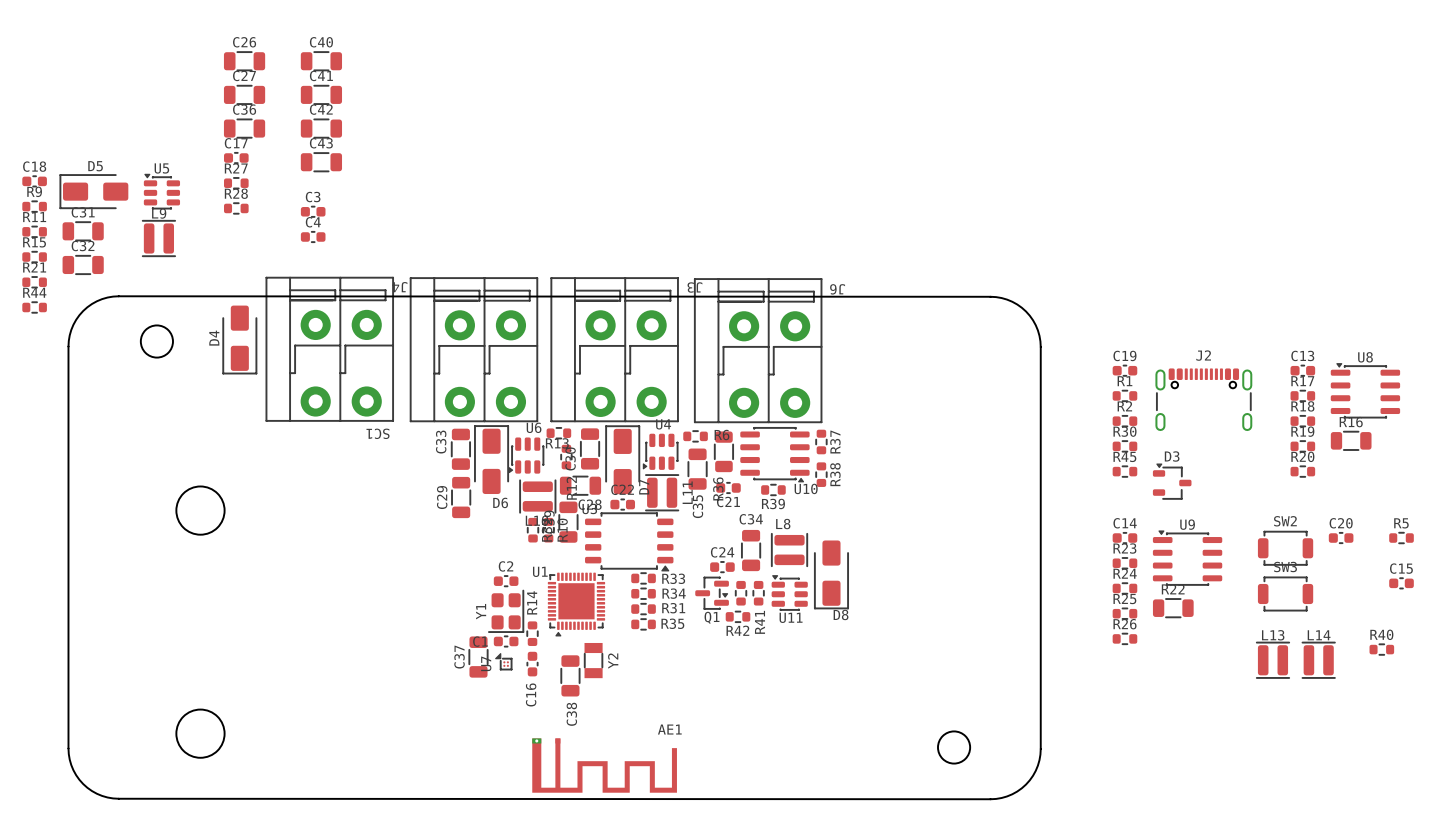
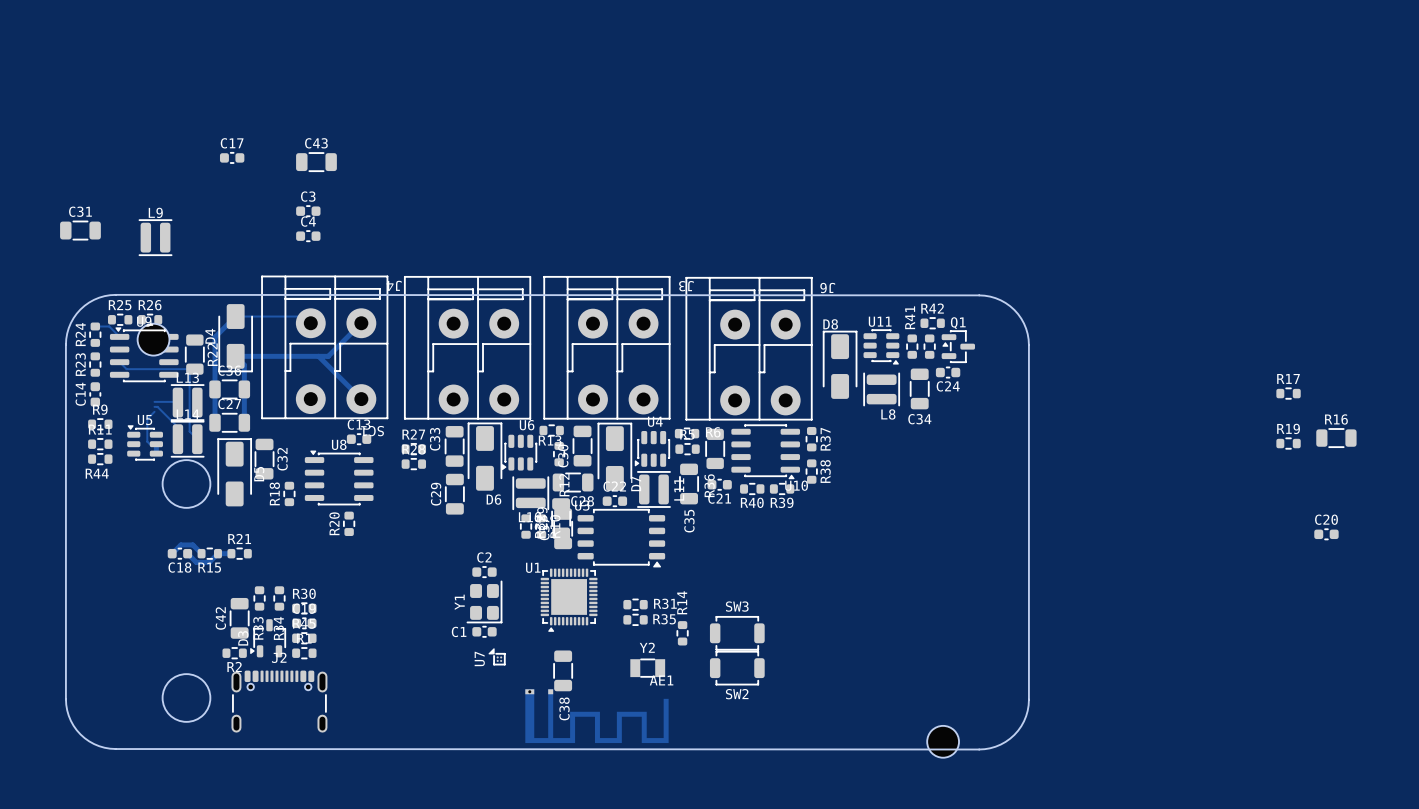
C26: (244, 61) -> none
C40: (321, 61) -> none
C27 position: (244, 94) -> (229, 422)
C41: (321, 94) -> none
C42 name position: C42 (321, 109) -> C42 (220, 618)
C36 position: (244, 128) -> (229, 389)
C42 rotation: 0° (321, 128) -> 90° clockwise (239, 618)
C42 position: (321, 128) -> (239, 618)
C18 name position: C18 (34, 166) -> C18 (179, 567)
C18 position: (34, 181) -> (179, 553)
R27 position: (236, 183) -> (413, 449)
D5 rotation: 0° (94, 191) -> 90° clockwise (234, 472)
D5 position: (94, 191) -> (234, 472)
U5 position: (161, 191) -> (145, 442)
R9 position: (34, 206) -> (100, 424)
R28 position: (236, 208) -> (413, 464)
R11 position: (34, 231) -> (100, 444)
R15 name position: R15 (34, 242) -> R15 (209, 567)
R15 position: (34, 257) -> (209, 553)
C32 rotation: 0° (83, 264) -> 90° clockwise (264, 459)
C32 position: (83, 264) -> (264, 459)
R21 position: (34, 282) -> (239, 553)
R44 name position: R44 (34, 292) -> R44 (97, 473)
R44 position: (34, 307) -> (100, 459)
track: none -> (310, 323) (304, 316) (235, 316) (215, 337) (215, 422)
track: none -> (361, 323) (328, 356) (235, 356) (244, 365) (244, 422)
track: none -> (95, 326) (109, 326) (119, 336)
part: none -> (929, 346)
track: none -> (318, 356) (361, 399)
track: none -> (119, 362) (126, 369) (194, 369)
C19 position: (1124, 370) -> (304, 623)
C13 position: (1302, 370) -> (359, 439)
track: none -> (194, 369) (189, 374) (189, 431) (197, 439)
U8 position: (1365, 390) -> (339, 477)
R1 position: (1124, 395) -> (304, 653)
J2 position: (1203, 399) -> (279, 701)
track: none -> (154, 401) (177, 402)
R2 name position: R2 (1124, 406) -> R2 (234, 666)
R18 name position: R18 (1302, 406) -> R18 (274, 493)
track: none -> (154, 406) (157, 406) (177, 427) (177, 439)
track: none -> (154, 411) (147, 419) (147, 441) (149, 444) (156, 444) (156, 453)
R2 position: (1124, 421) -> (234, 653)
R18 rotation: 0° (1302, 421) -> 90° clockwise (289, 493)
R18 position: (1302, 421) -> (289, 493)
R30 position: (1124, 446) -> (304, 608)
R20 name position: R20 (1302, 456) -> R20 (334, 523)
C35 position: (697, 469) -> (689, 484)
R45 position: (1124, 471) -> (304, 638)
R20 rotation: 0° (1302, 471) -> 90° clockwise (349, 523)
R20 position: (1302, 471) -> (349, 523)
D3 rotation: 0° (1172, 481) -> 90° counterclockwise (268, 638)
D3 position: (1172, 481) -> (268, 638)
R39 position: (773, 489) -> (782, 488)
part position: (200, 510) -> (186, 484)
C34 name position: C34 (751, 519) -> C34 (919, 419)
SW2 name position: SW2 (1285, 521) -> SW2 (737, 694)
C14 name position: C14 (1125, 523) -> C14 (80, 394)
L8 name position: L8 (783, 524) -> L8 (888, 414)
C14 rotation: 0° (1124, 538) -> 90° clockwise (95, 394)
C14 position: (1124, 538) -> (95, 394)
R5 position: (1401, 538) -> (687, 449)
R23 name position: R23 (1124, 548) -> R23 (80, 364)
SW2 position: (1285, 548) -> (737, 668)
C34 position: (751, 550) -> (919, 388)
L8 position: (789, 550) -> (881, 389)
C24 name position: C24 (722, 552) -> C24 (948, 386)
track: none -> (172, 553) (180, 544) (192, 544) (201, 553)
track: none -> (187, 553) (196, 562) (209, 562) (217, 553) (231, 553)
U9 position: (1187, 557) -> (144, 354)
R23 rotation: 0° (1124, 563) -> 90° clockwise (95, 364)
R23 position: (1124, 563) -> (95, 364)
C24 position: (722, 567) -> (948, 372)
R24 name position: R24 (1125, 573) -> R24 (80, 334)
D8 rotation: 0° (831, 574) -> 180° (840, 364)
D8 position: (831, 574) -> (840, 364)
R33 rotation: 0° (643, 578) -> 90° clockwise (259, 598)
R33 position: (643, 578) -> (259, 598)
C2 position: (506, 581) -> (484, 572)
C15: (1401, 583) -> none
R24 rotation: 0° (1124, 588) -> 90° clockwise (95, 334)
R24 position: (1124, 588) -> (95, 334)
U11 rotation: 0° (789, 592) -> 180° (881, 347)
U11 position: (789, 592) -> (881, 347)
R34 rotation: 0° (643, 593) -> 90° clockwise (279, 598)
R34 position: (643, 593) -> (279, 598)
Q1 rotation: 0° (712, 593) -> 180° (958, 346)
Q1 position: (712, 593) -> (958, 346)
part: (741, 593) -> none
R41 position: (758, 593) -> (912, 346)
SW3 position: (1285, 593) -> (737, 633)
R22 rotation: 0° (1173, 608) -> 90° clockwise (194, 354)
R22 position: (1173, 608) -> (194, 354)
Y1 position: (506, 611) -> (484, 601)
R25 position: (1124, 613) -> (120, 319)
R42 position: (738, 616) -> (932, 323)
R41 name position: R41 (760, 622) -> R41 (910, 317)
R42 name position: R42 (737, 630) -> R42 (932, 308)
R14 position: (532, 633) -> (682, 633)
R40 name position: R40 (1381, 634) -> R40 (752, 502)
R26 position: (1124, 638) -> (150, 319)
C1 position: (506, 641) -> (484, 631)
R40 position: (1381, 649) -> (752, 488)
C37 position: (478, 657) -> (563, 528)
Y2 rotation: 0° (593, 660) -> 90° clockwise (647, 668)
Y2 position: (593, 660) -> (647, 668)
L13 position: (1272, 660) -> (187, 402)
L14 position: (1318, 660) -> (187, 439)
Y2 name position: Y2 (613, 661) -> Y2 (647, 647)
C16: (532, 664) -> none
board edge: (68, 704) (68, 754) (73, 770) (87, 787) (102, 795) (113, 798) (990, 799) (1001, 797) (1017, 791) (1029, 780) (1035, 770) (1040, 754) (1040, 705) -> (65, 699) (68, 715) (80, 734) (94, 744) (115, 749) (979, 749) (995, 746) (1014, 734) (1024, 721) (1028, 699)
part position: (200, 733) -> (186, 698)
AE1 position: (604, 765) -> (596, 716)

